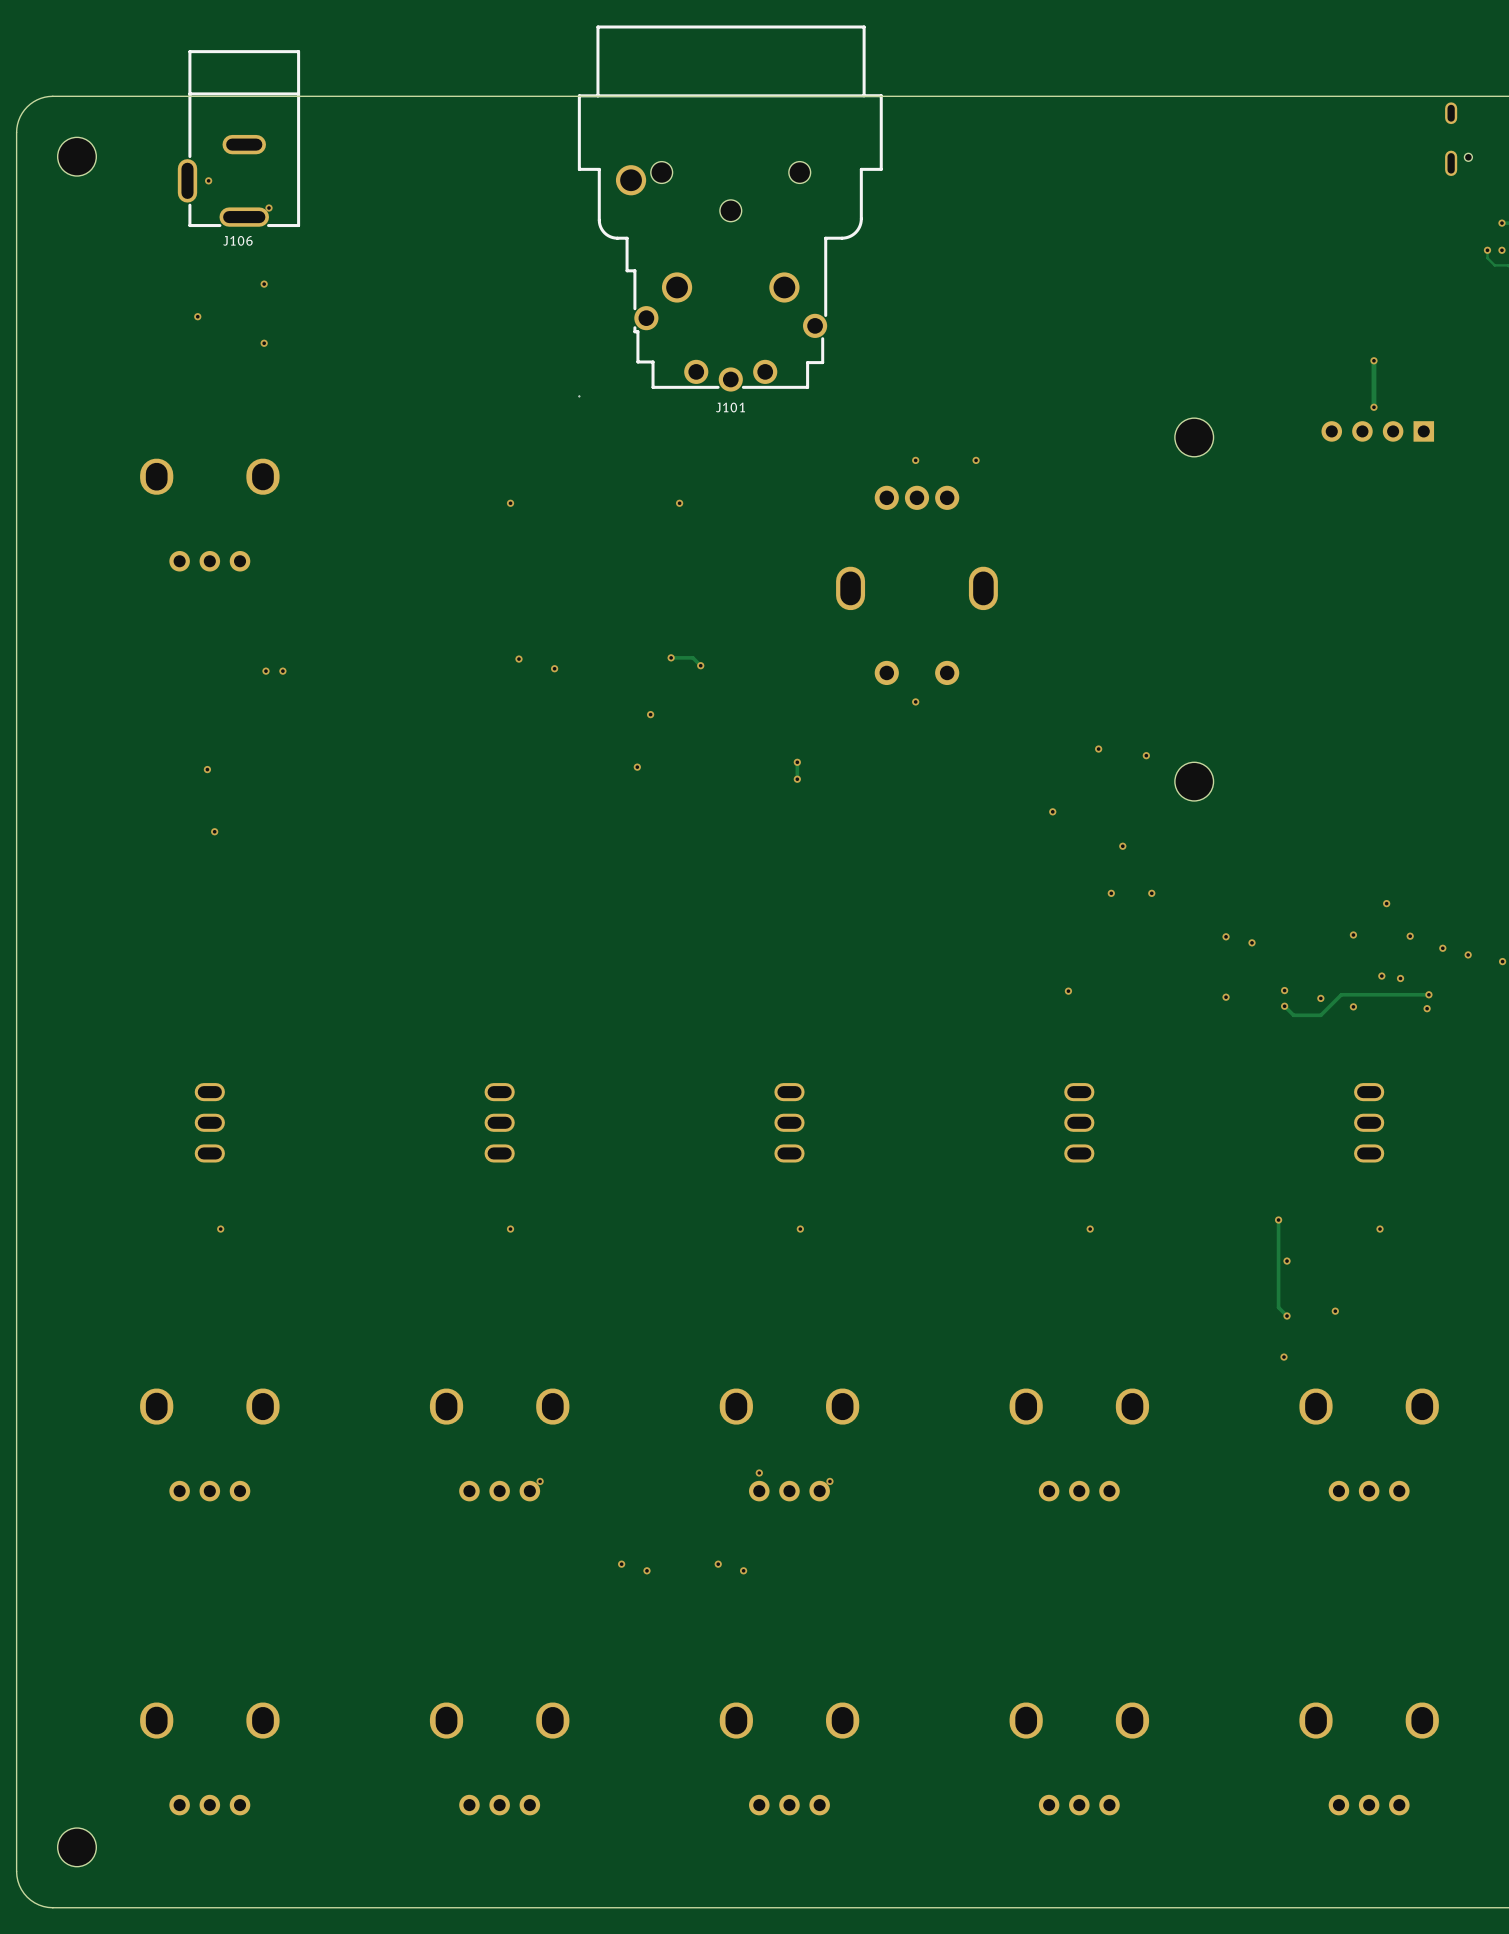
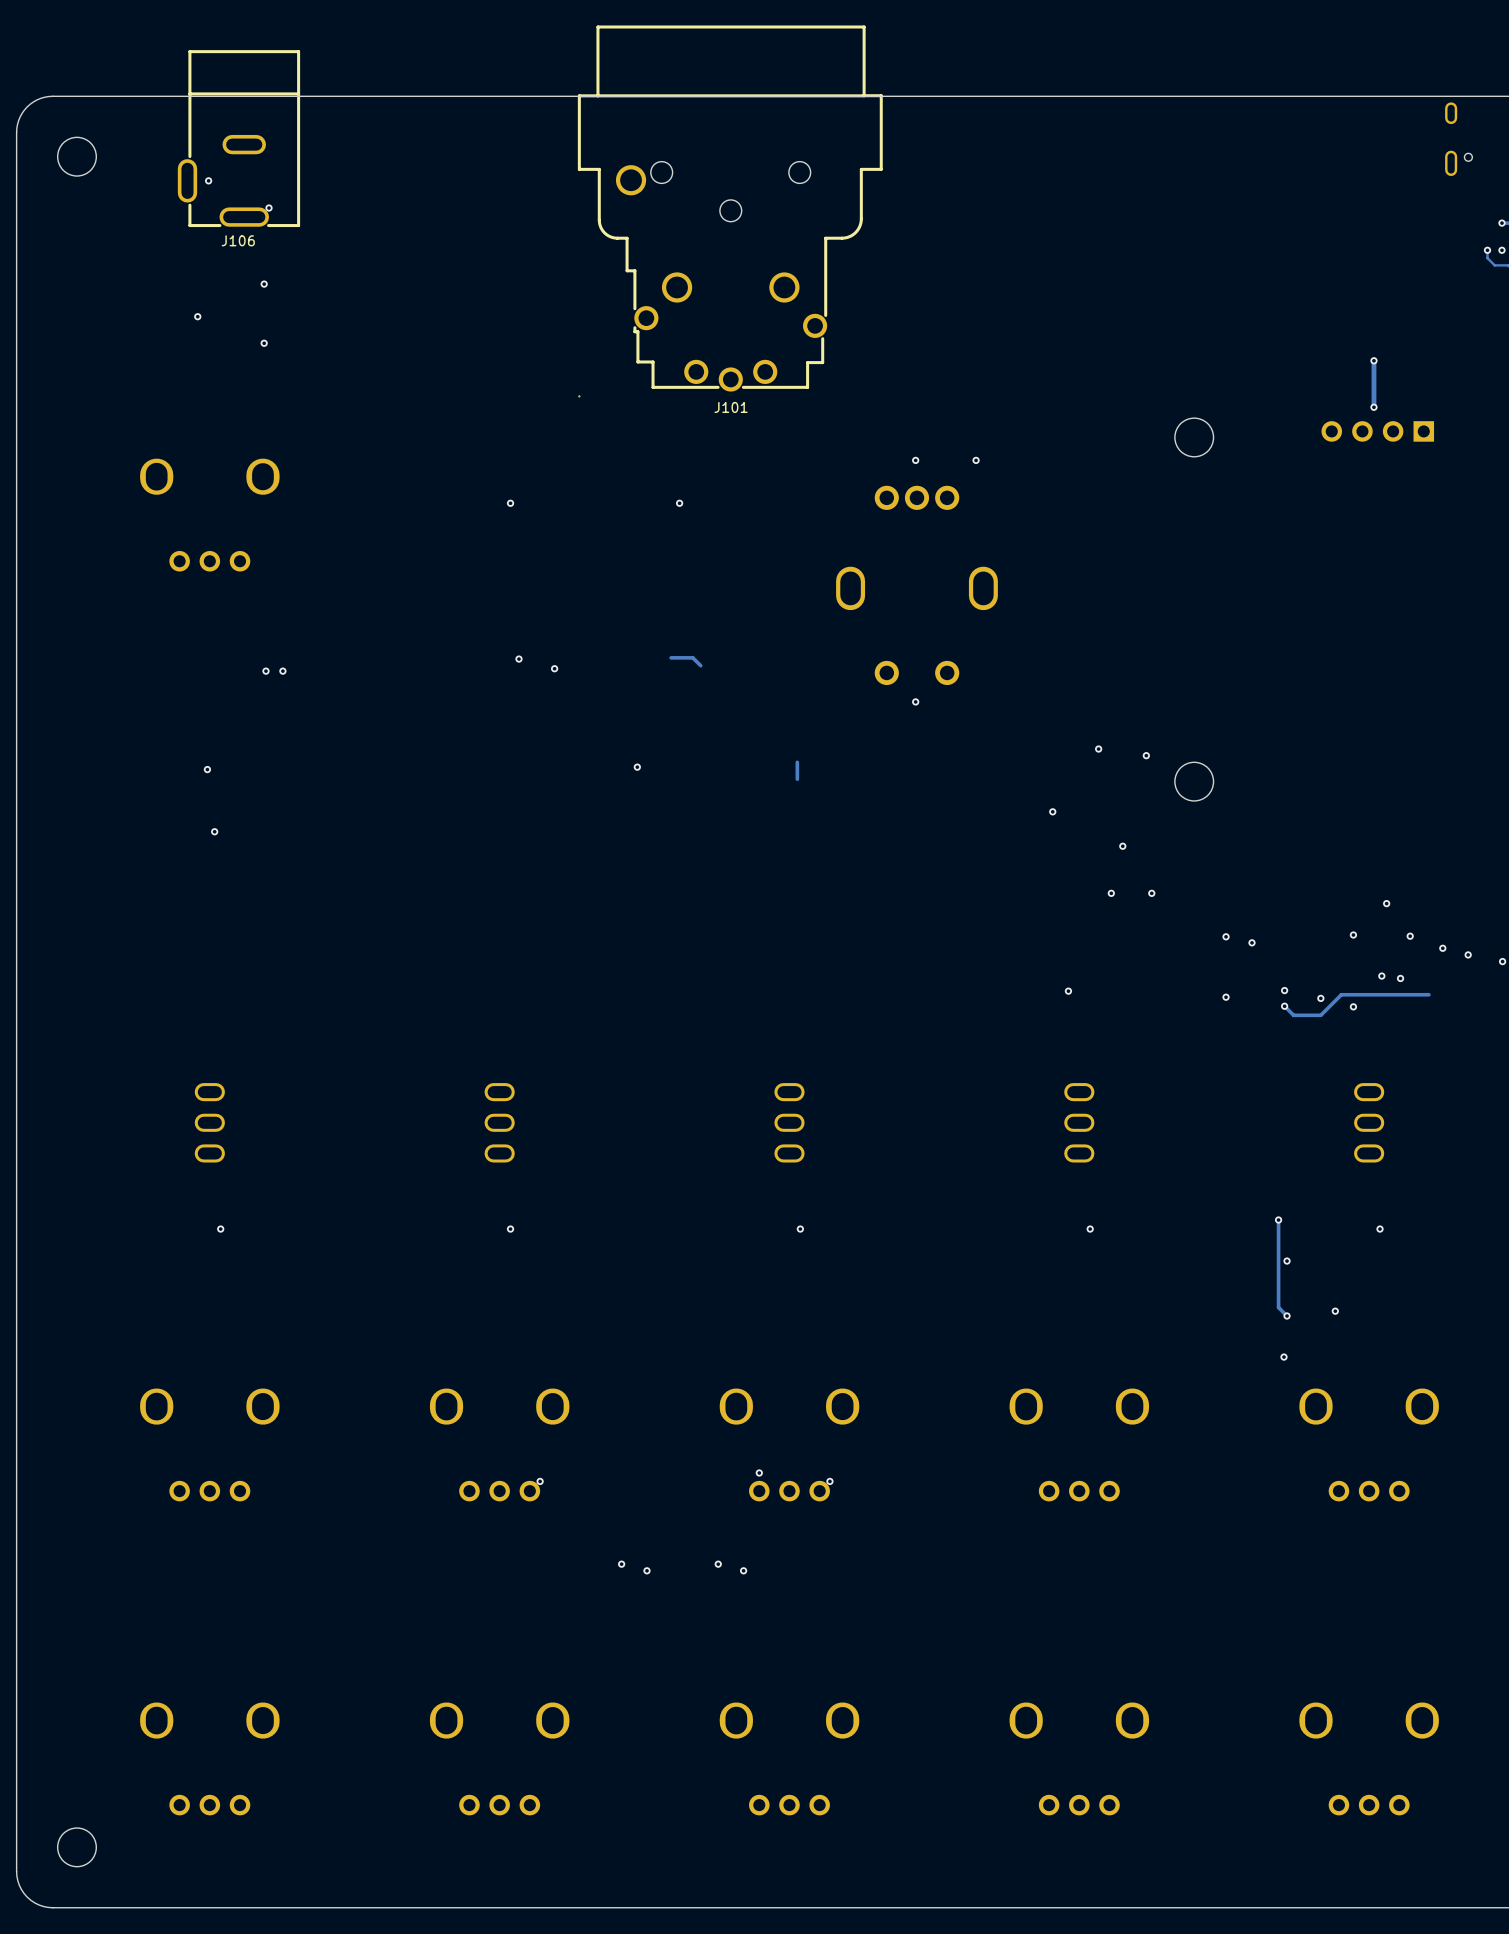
via: (671, 657) -> none
via: (700, 665) -> none
via: (650, 714) -> none
via: (797, 762) -> none
via: (797, 779) -> none
via: (1428, 994) -> none
via: (1427, 1008) -> none

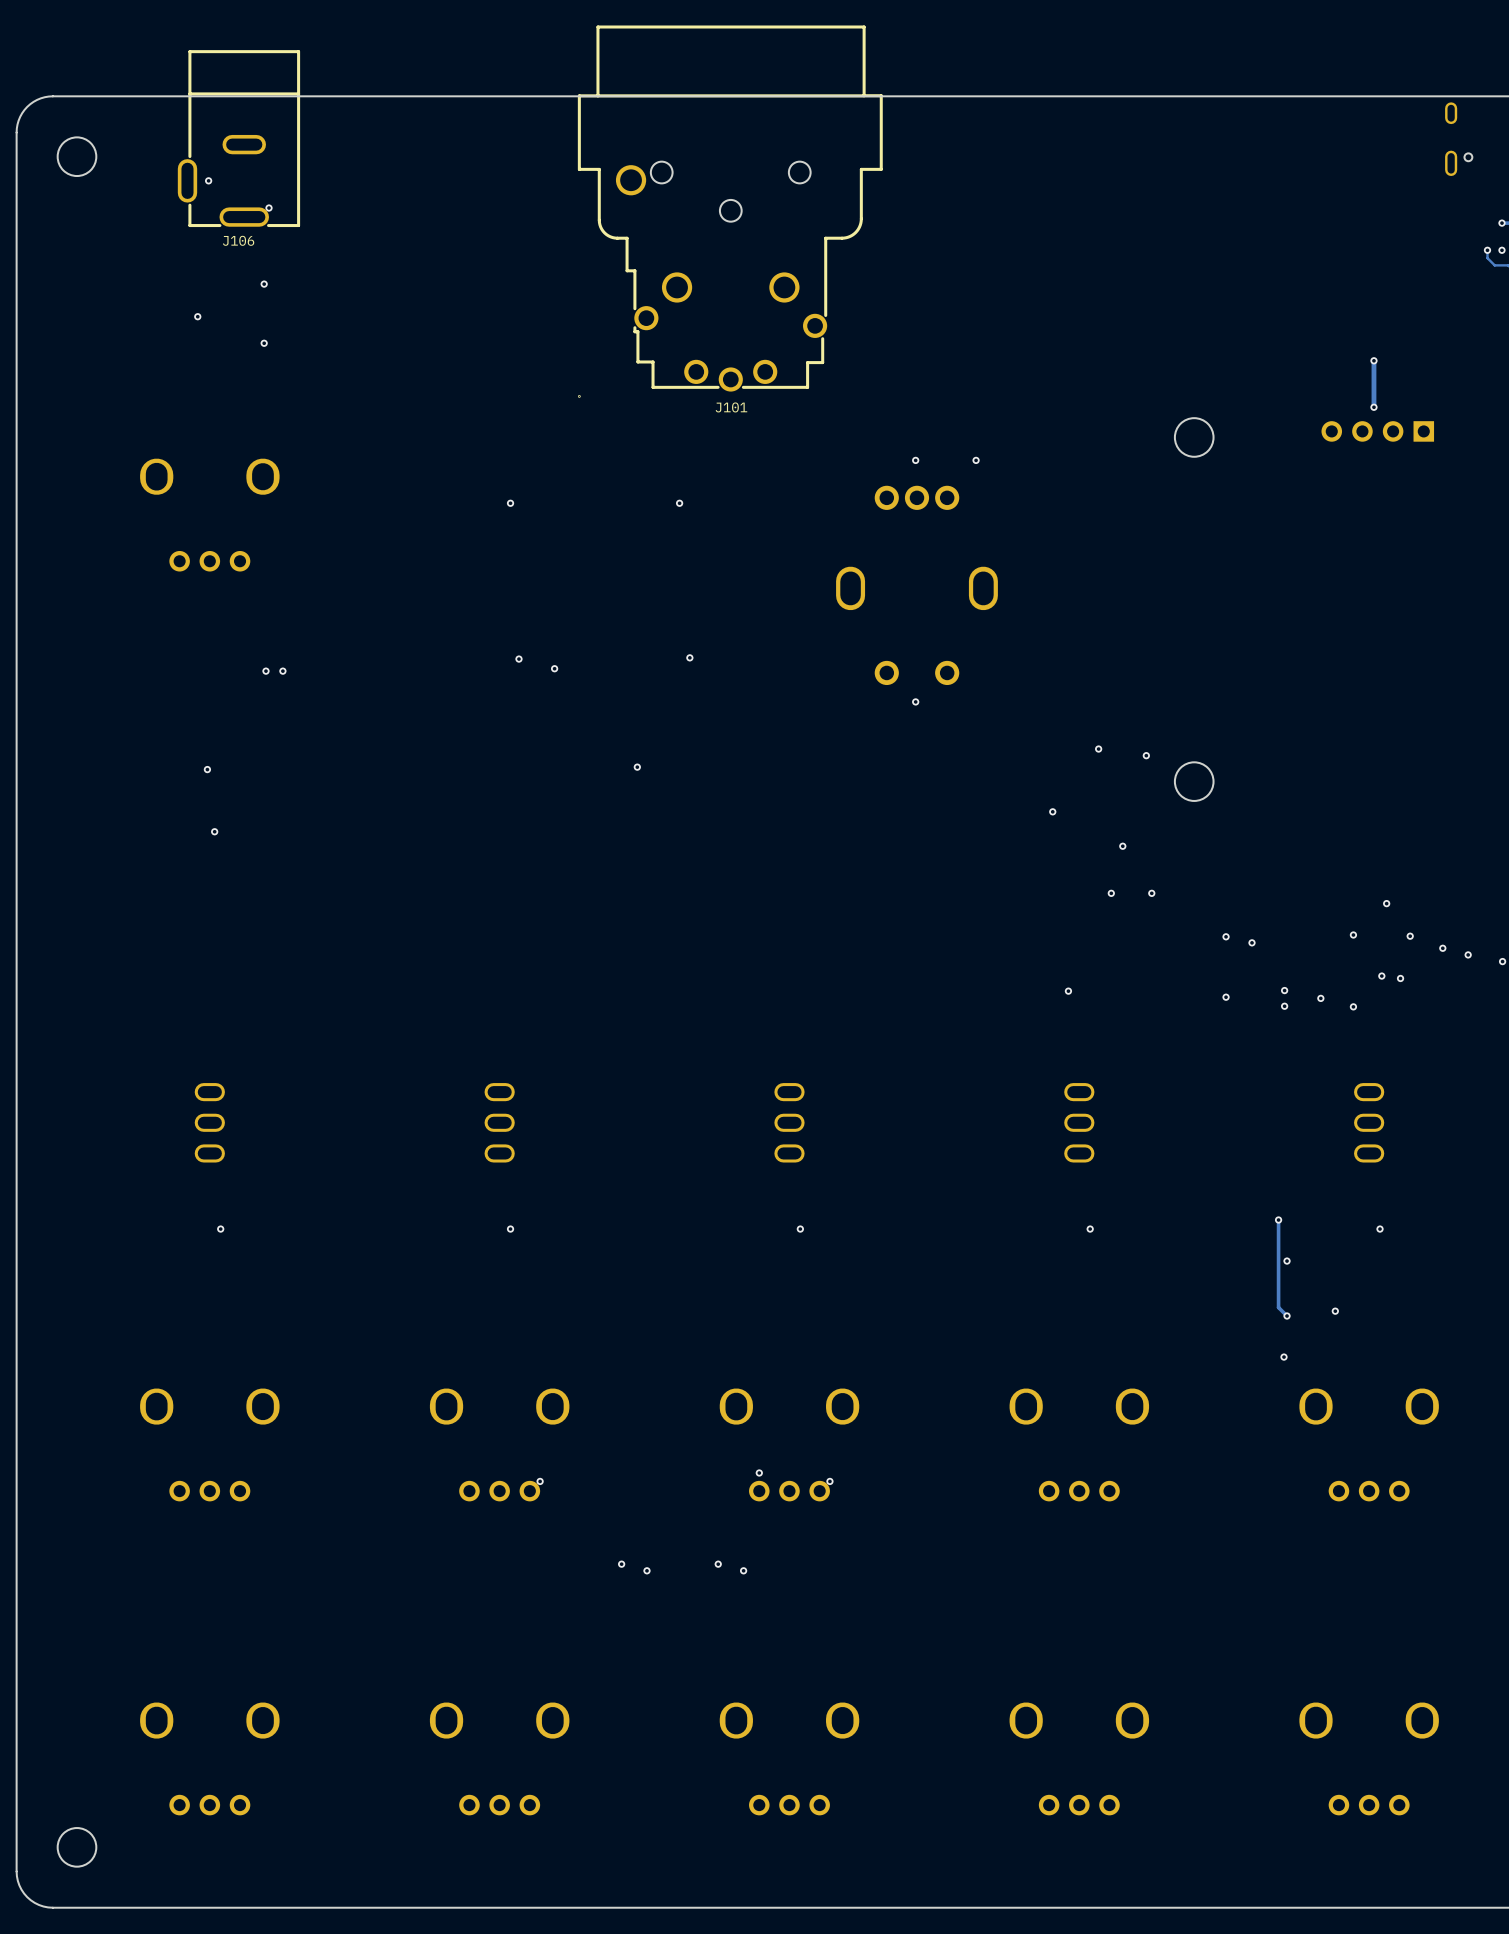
track: (671, 657) (692, 657) (700, 665) -> none
via: none -> (689, 657)
track: (797, 762) (797, 779) -> none
track: (1428, 994) (1341, 994) (1320, 1015) (1293, 1015) (1284, 1006) -> none

